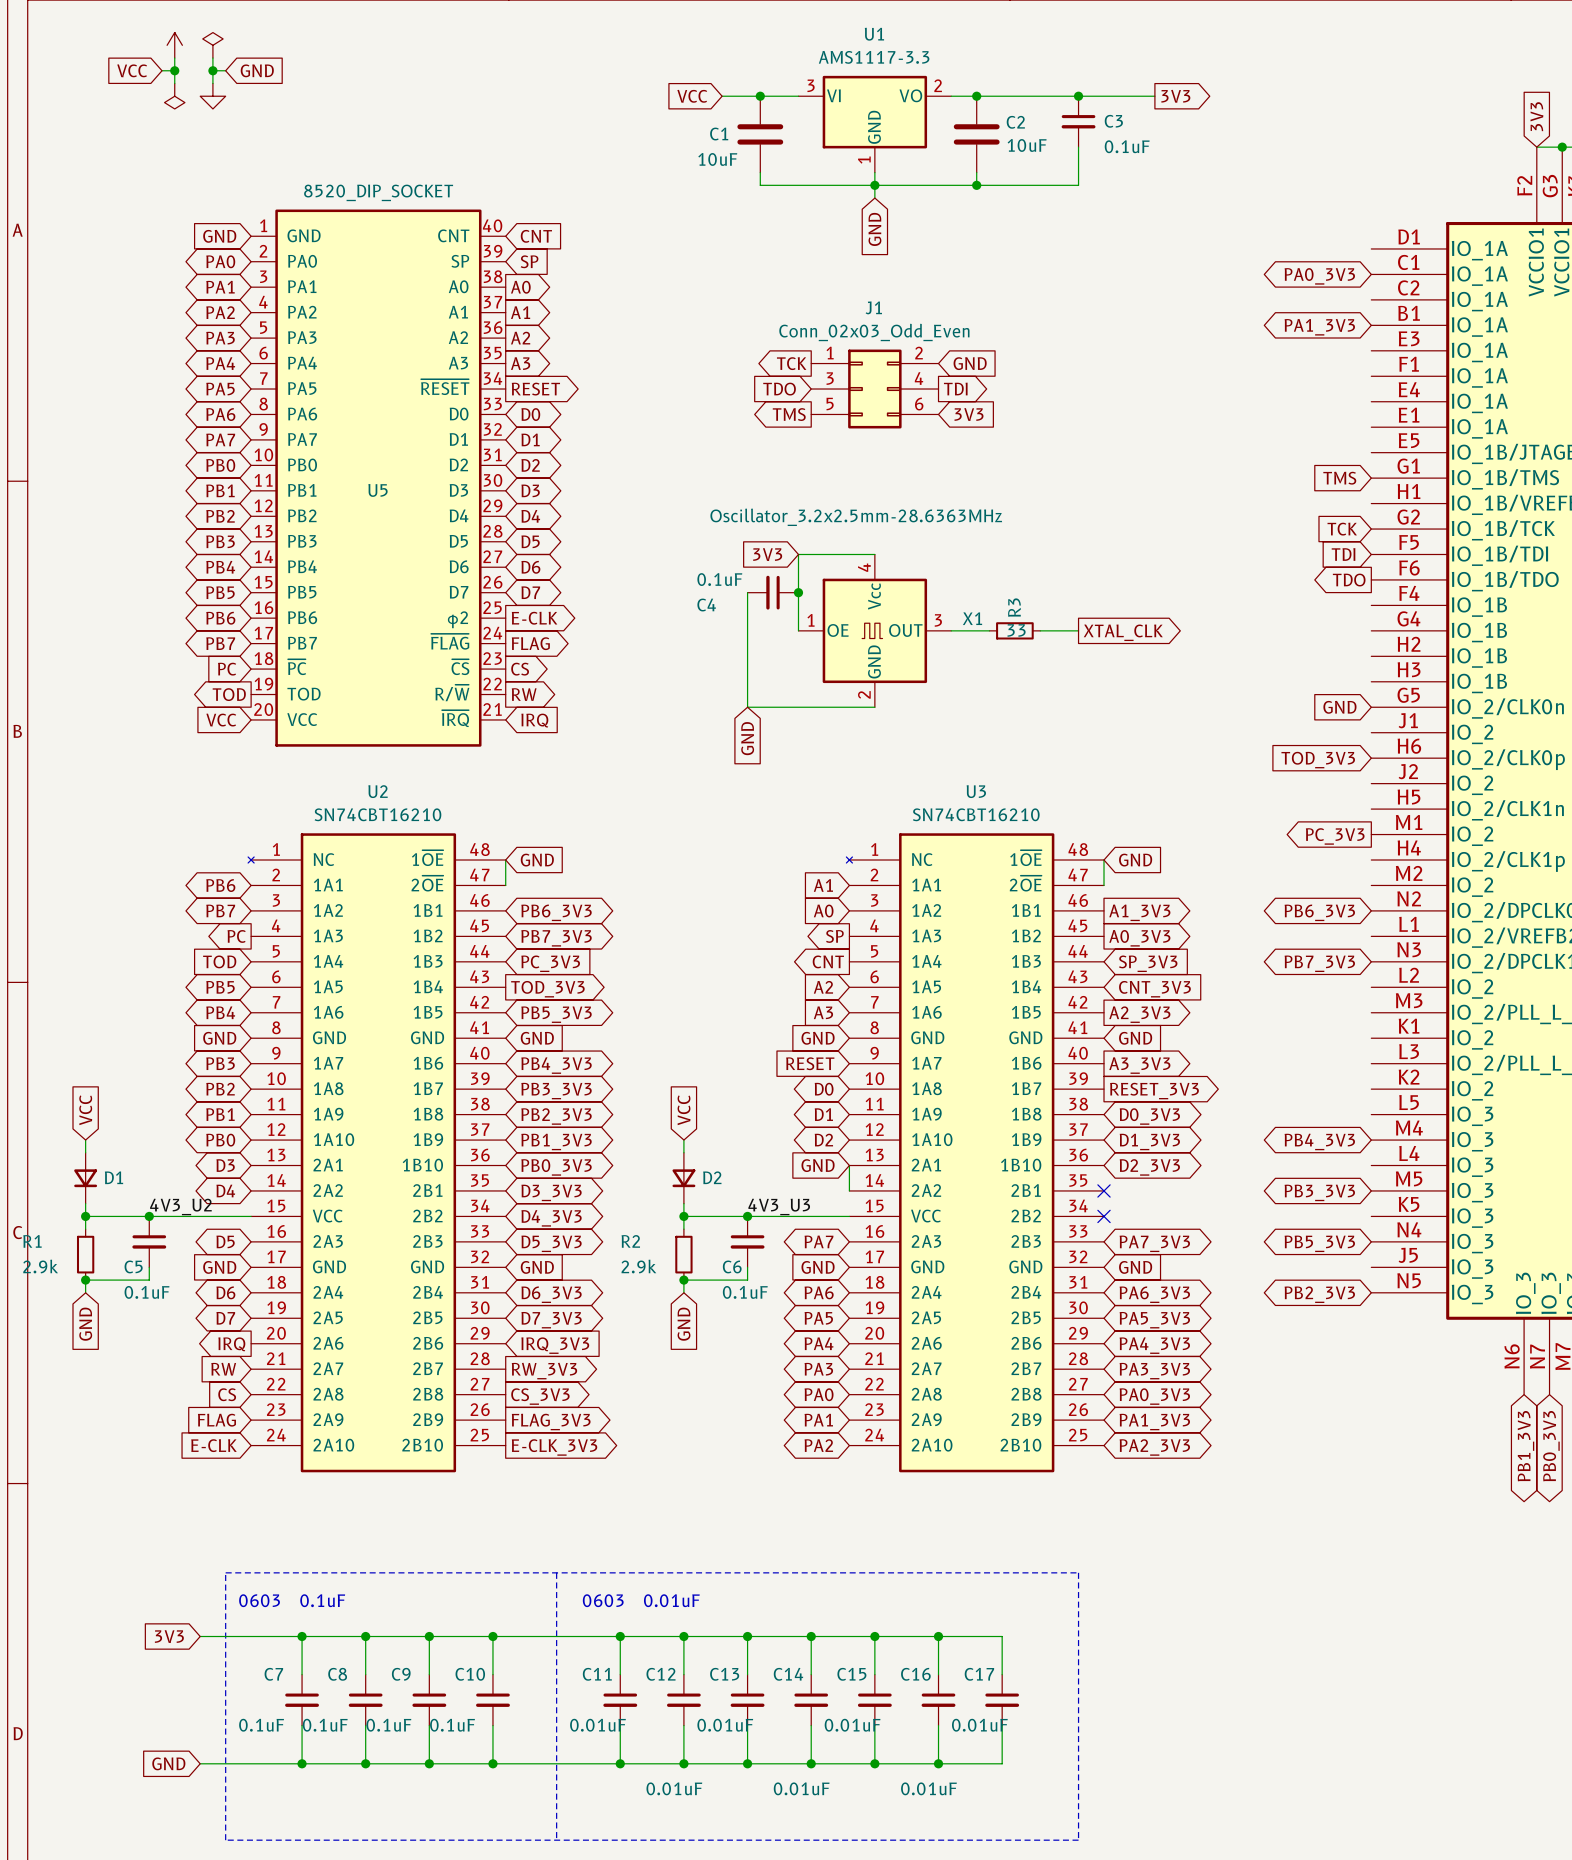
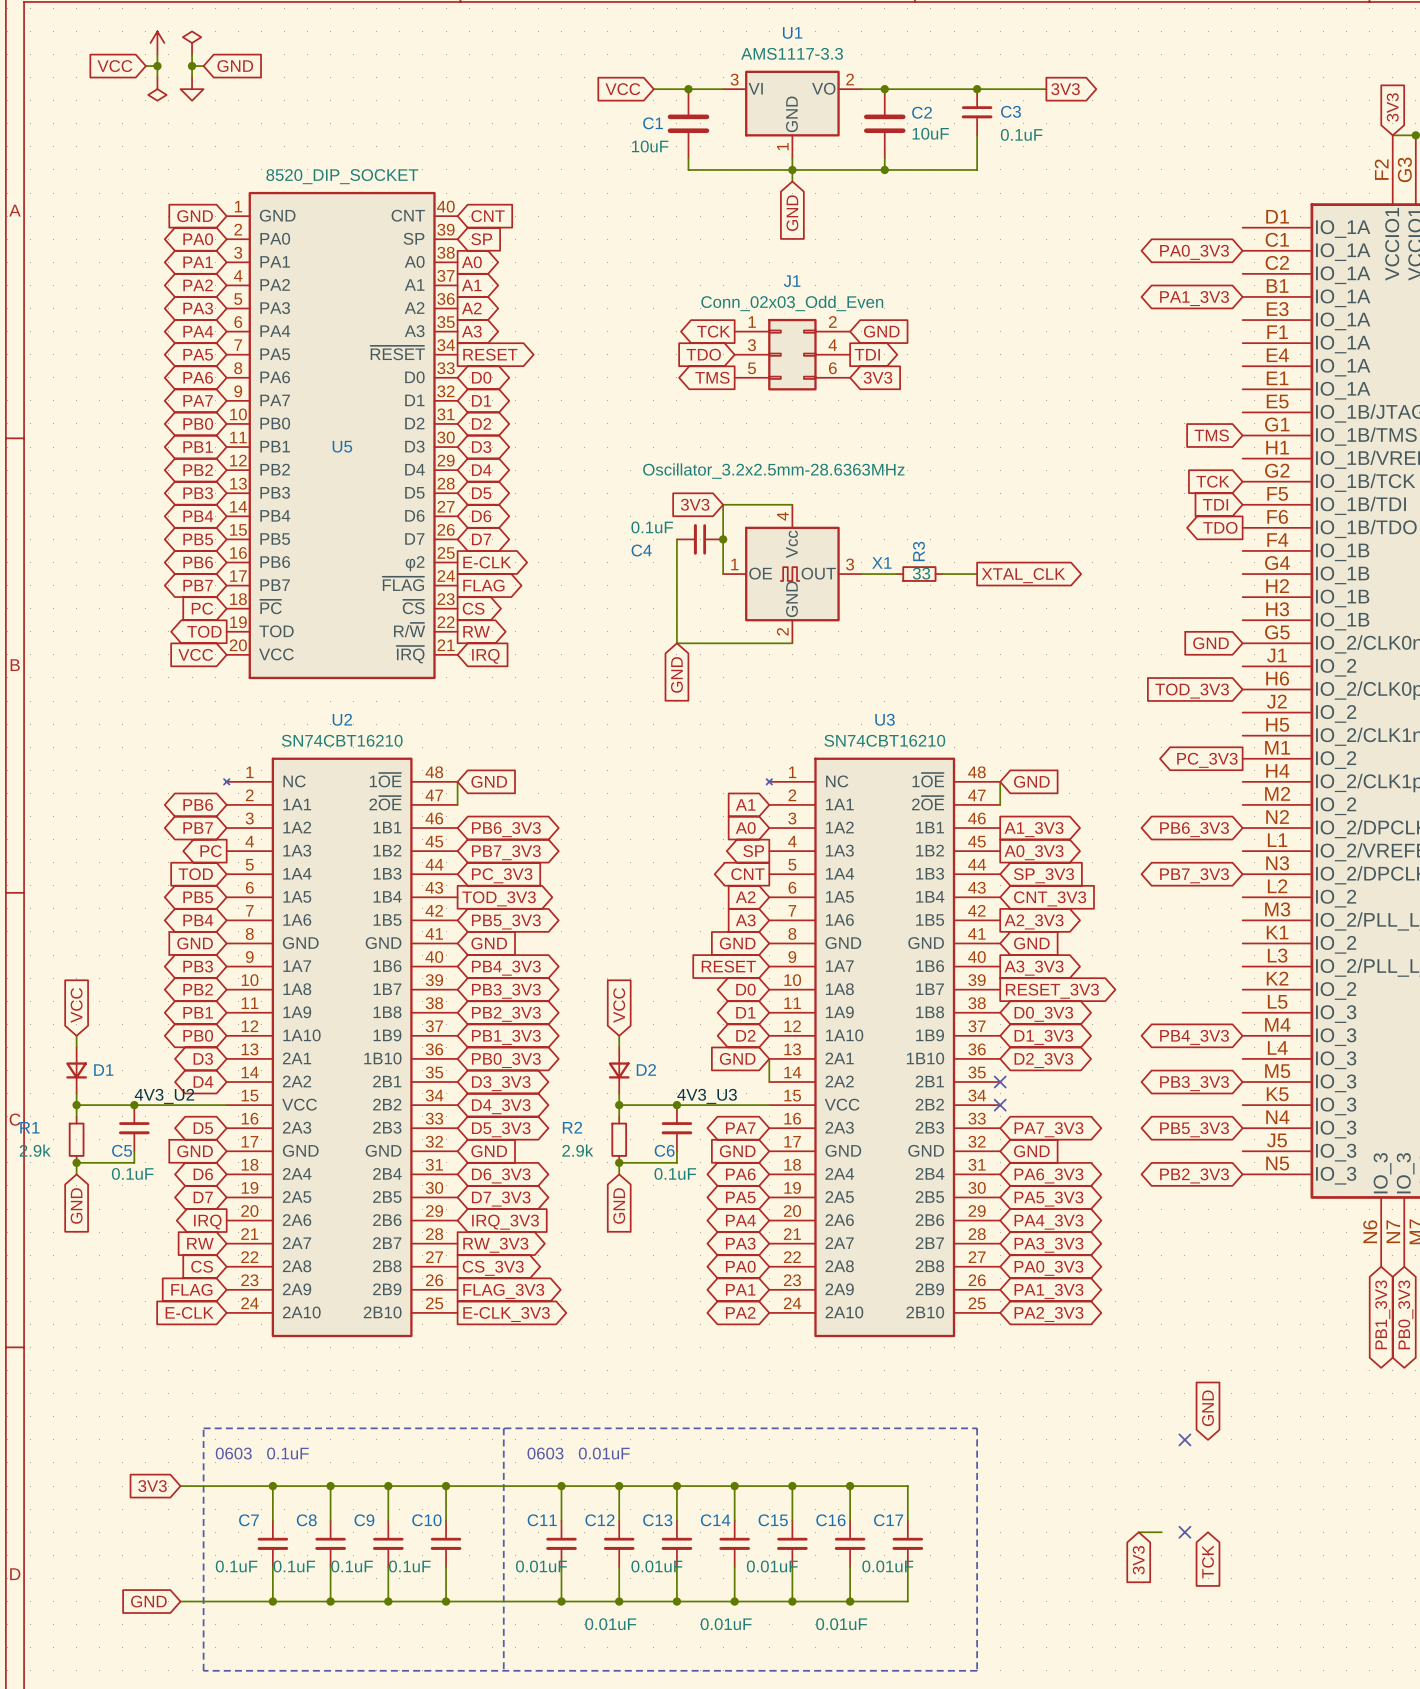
global label: none -> GND (1208, 1408)
no-connect mark: none -> (1184, 1439)
wire: none -> (1138, 1532) (1161, 1532)
no-connect mark: none -> (1184, 1532)
global label: none -> TCK (1208, 1561)
global label: none -> 3V3 (1138, 1560)

